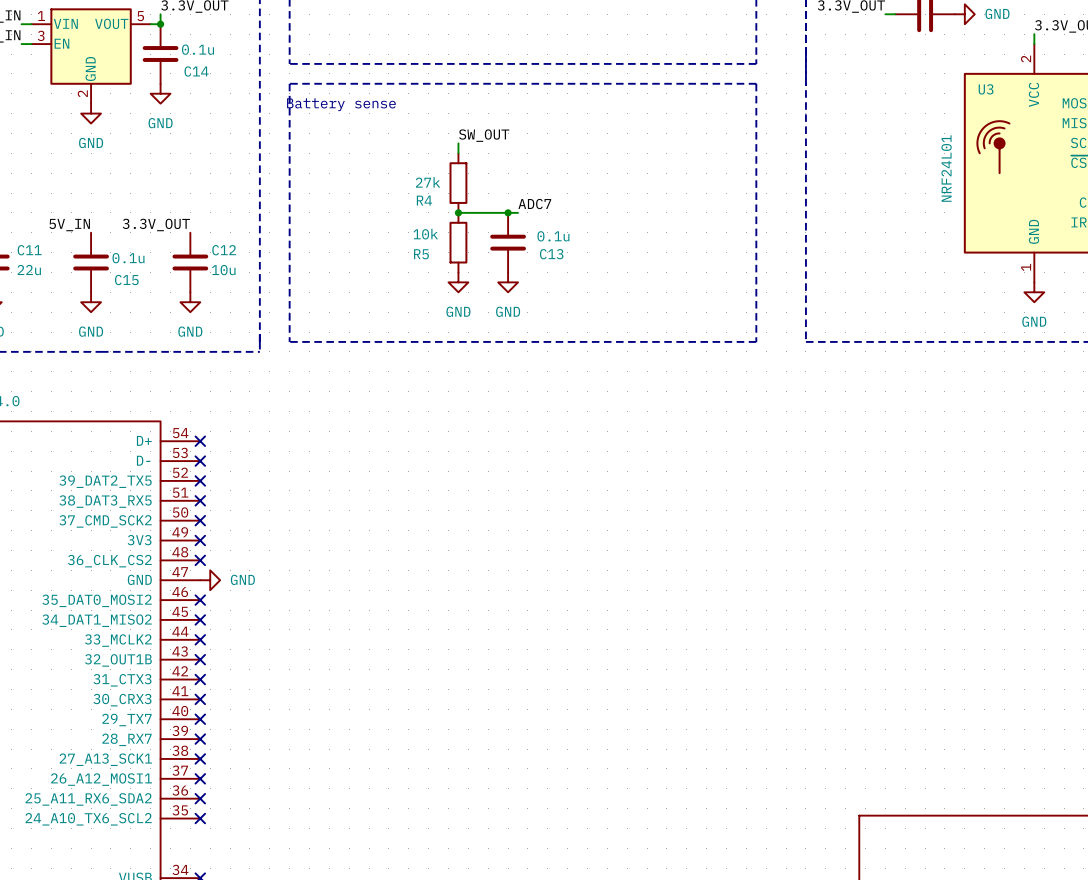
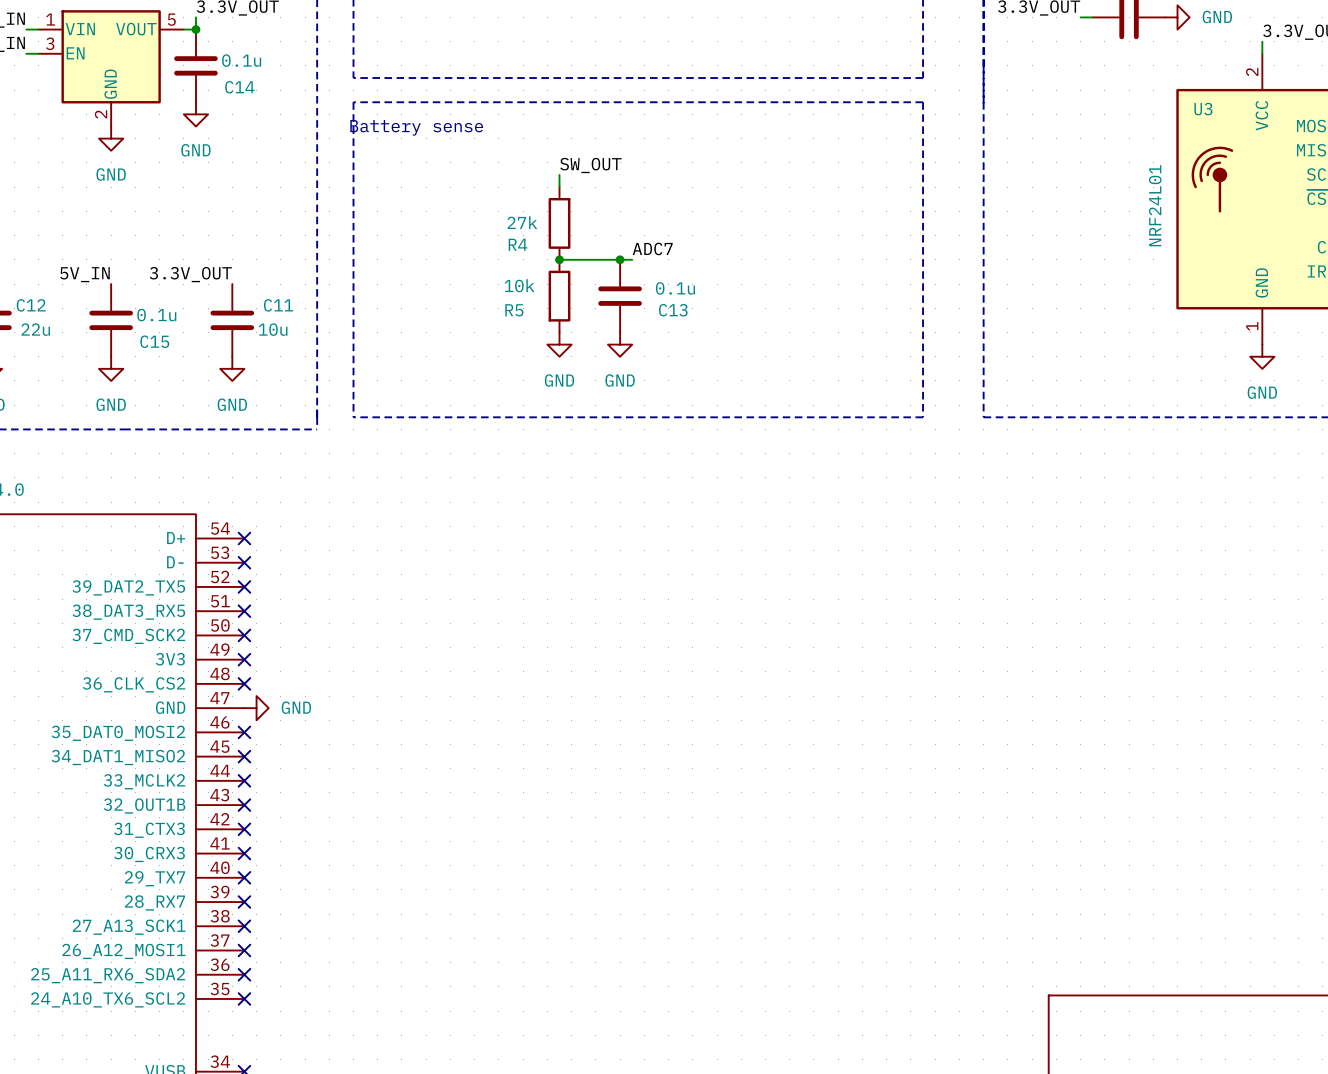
C11 name: C11 (29, 250) -> C12 (31, 305)
C12 name: C12 (224, 250) -> C11 (278, 305)

